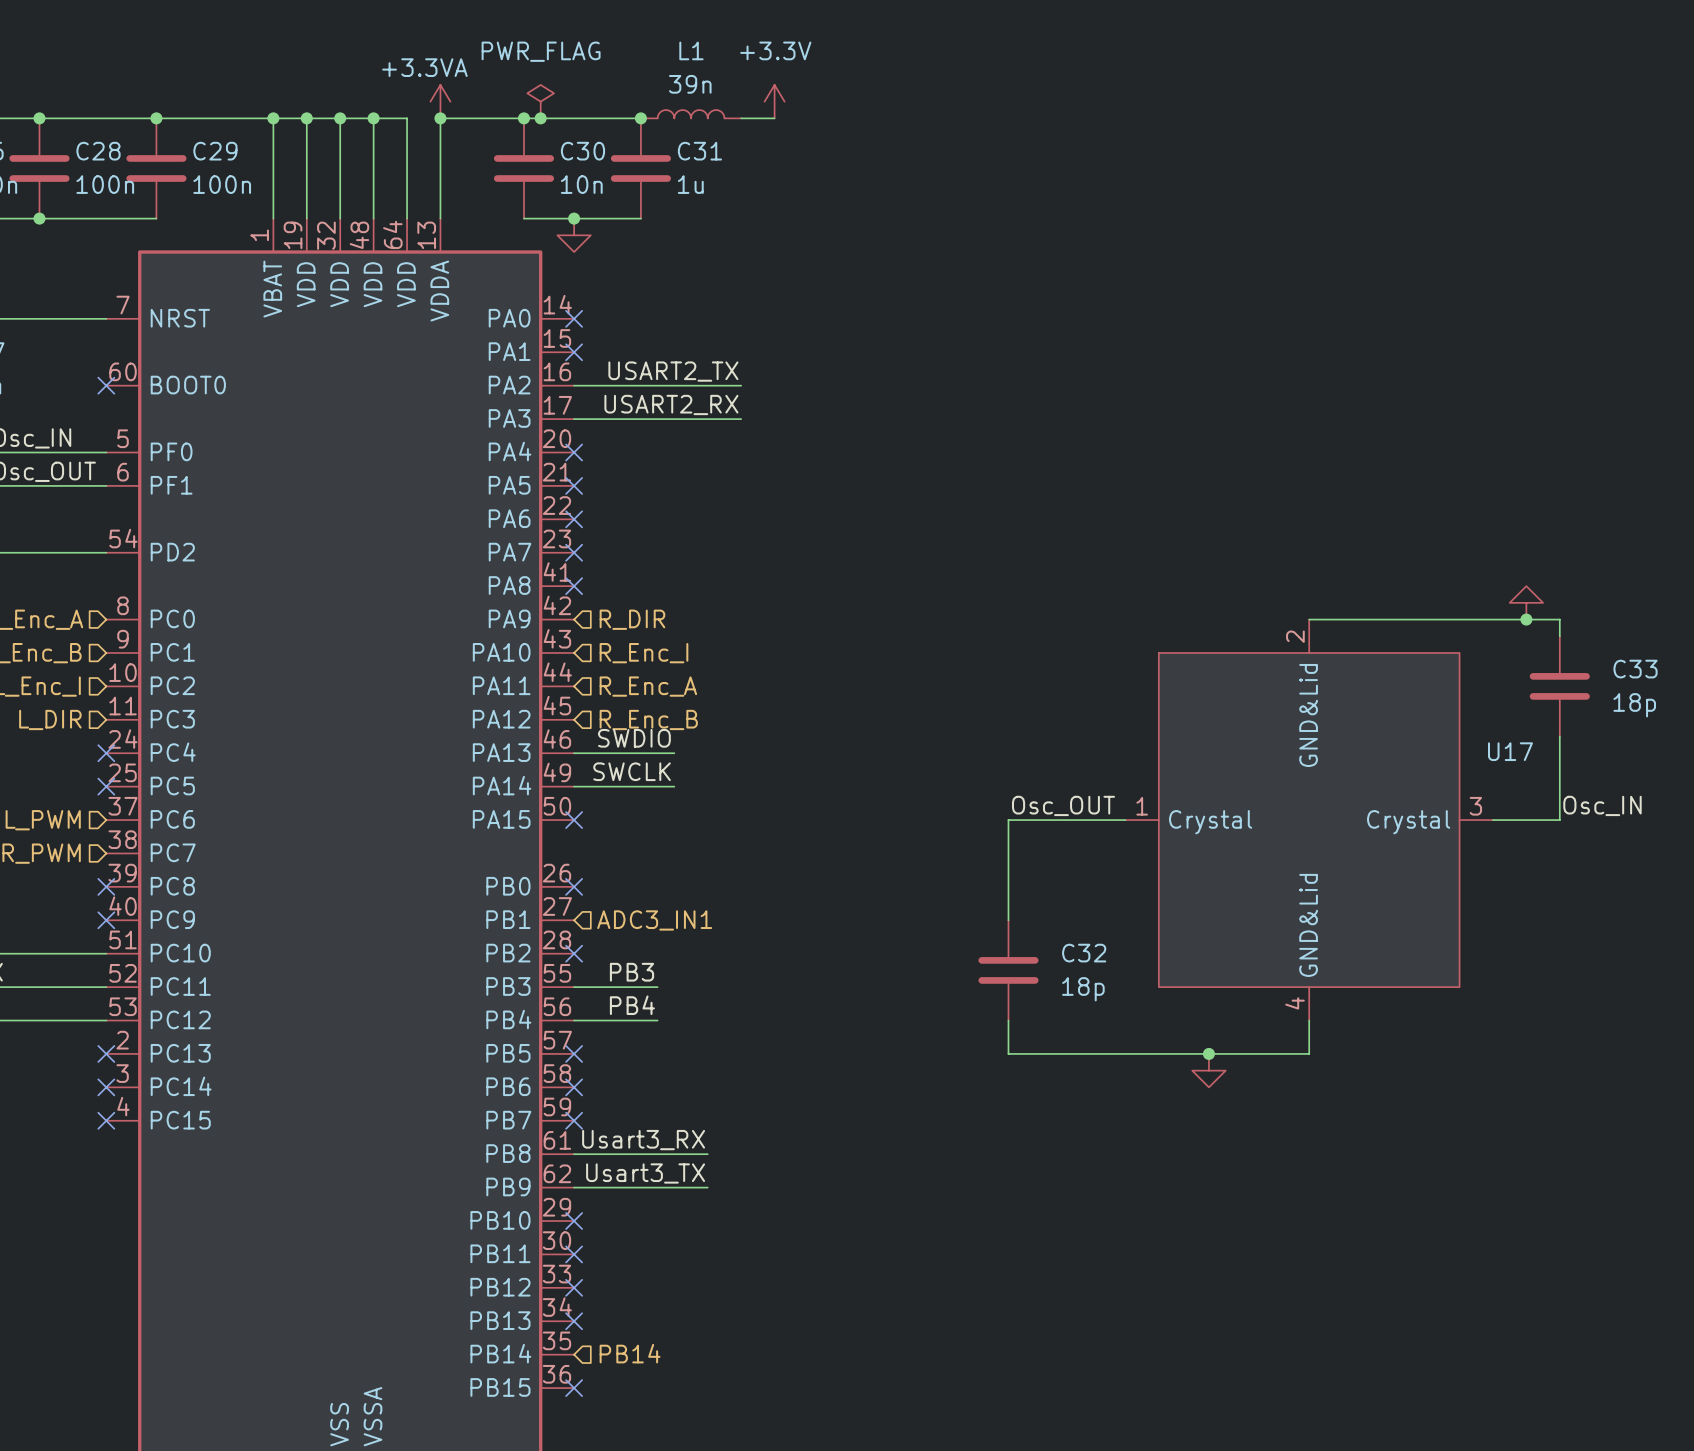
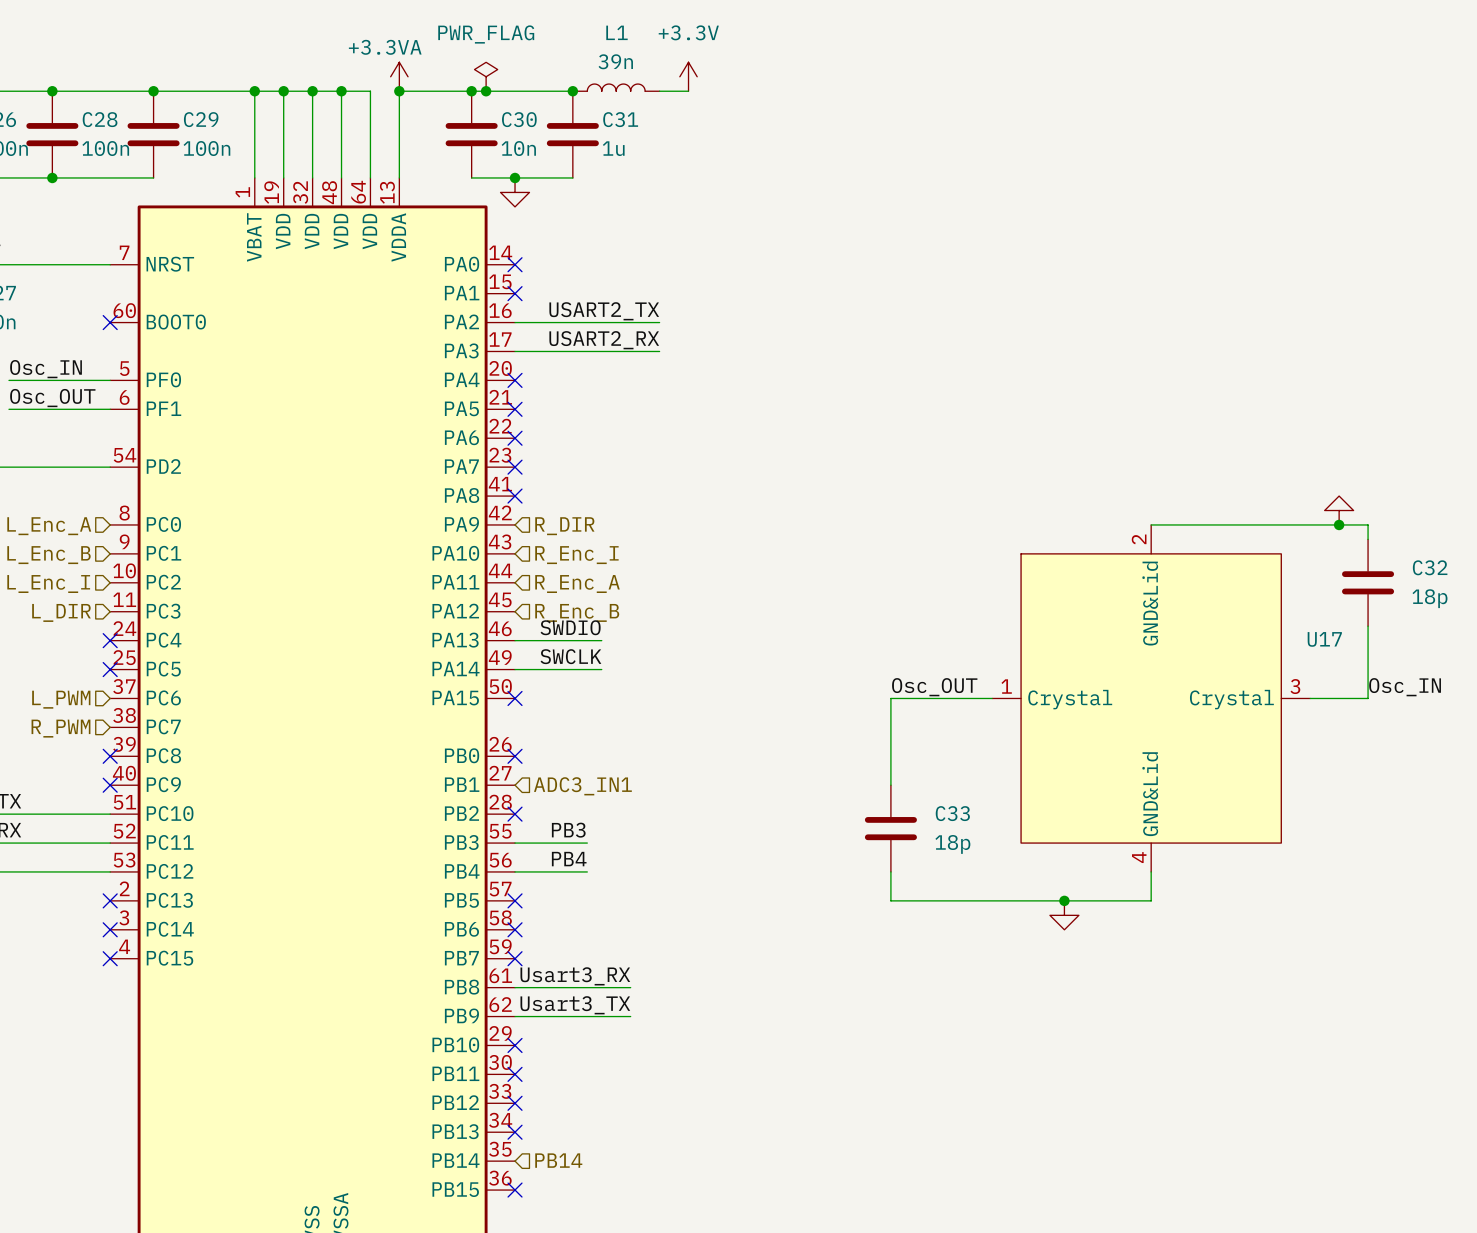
C33 name: C33 (1635, 669) -> C32 (1430, 567)
C32 name: C32 (1084, 953) -> C33 (952, 813)

